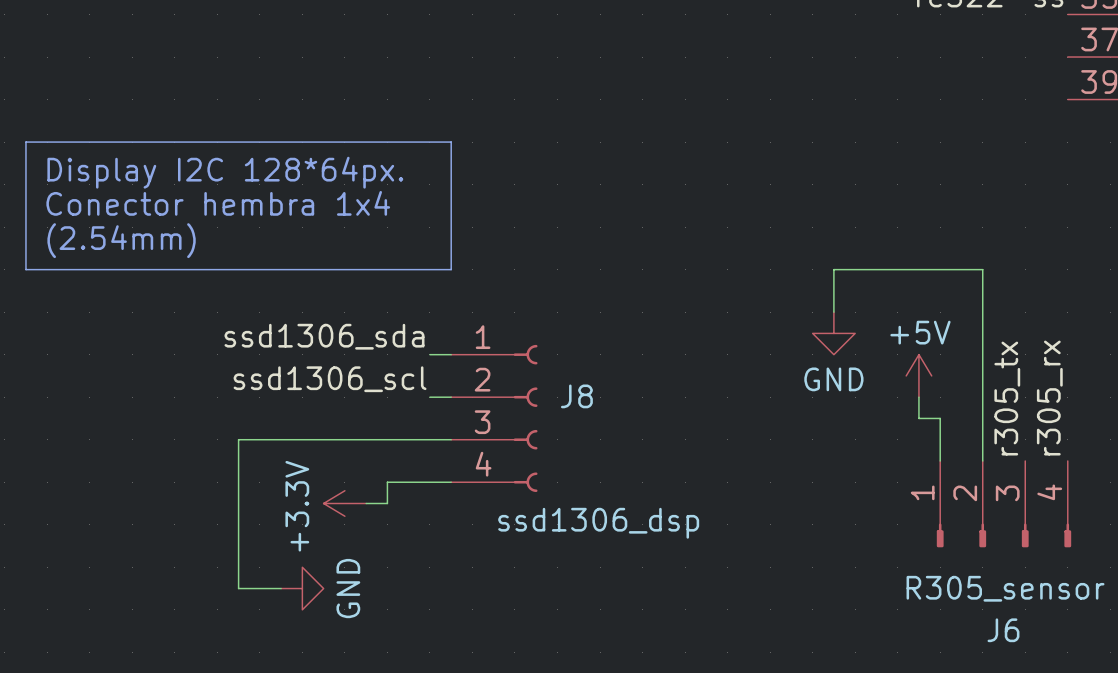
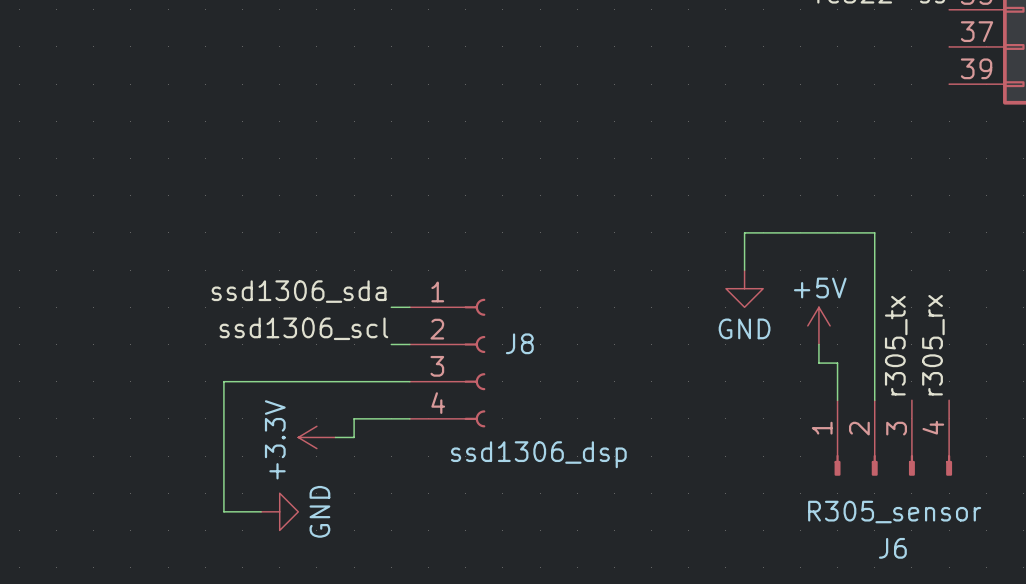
line: (25, 142) (451, 142) (451, 269) (25, 269) (25, 142) -> none
text: Display I2C 128*64px. (225, 172) -> none
text: Conector hembra 1x4 (218, 203) -> none
text: (2.54mm) (121, 240) -> none

